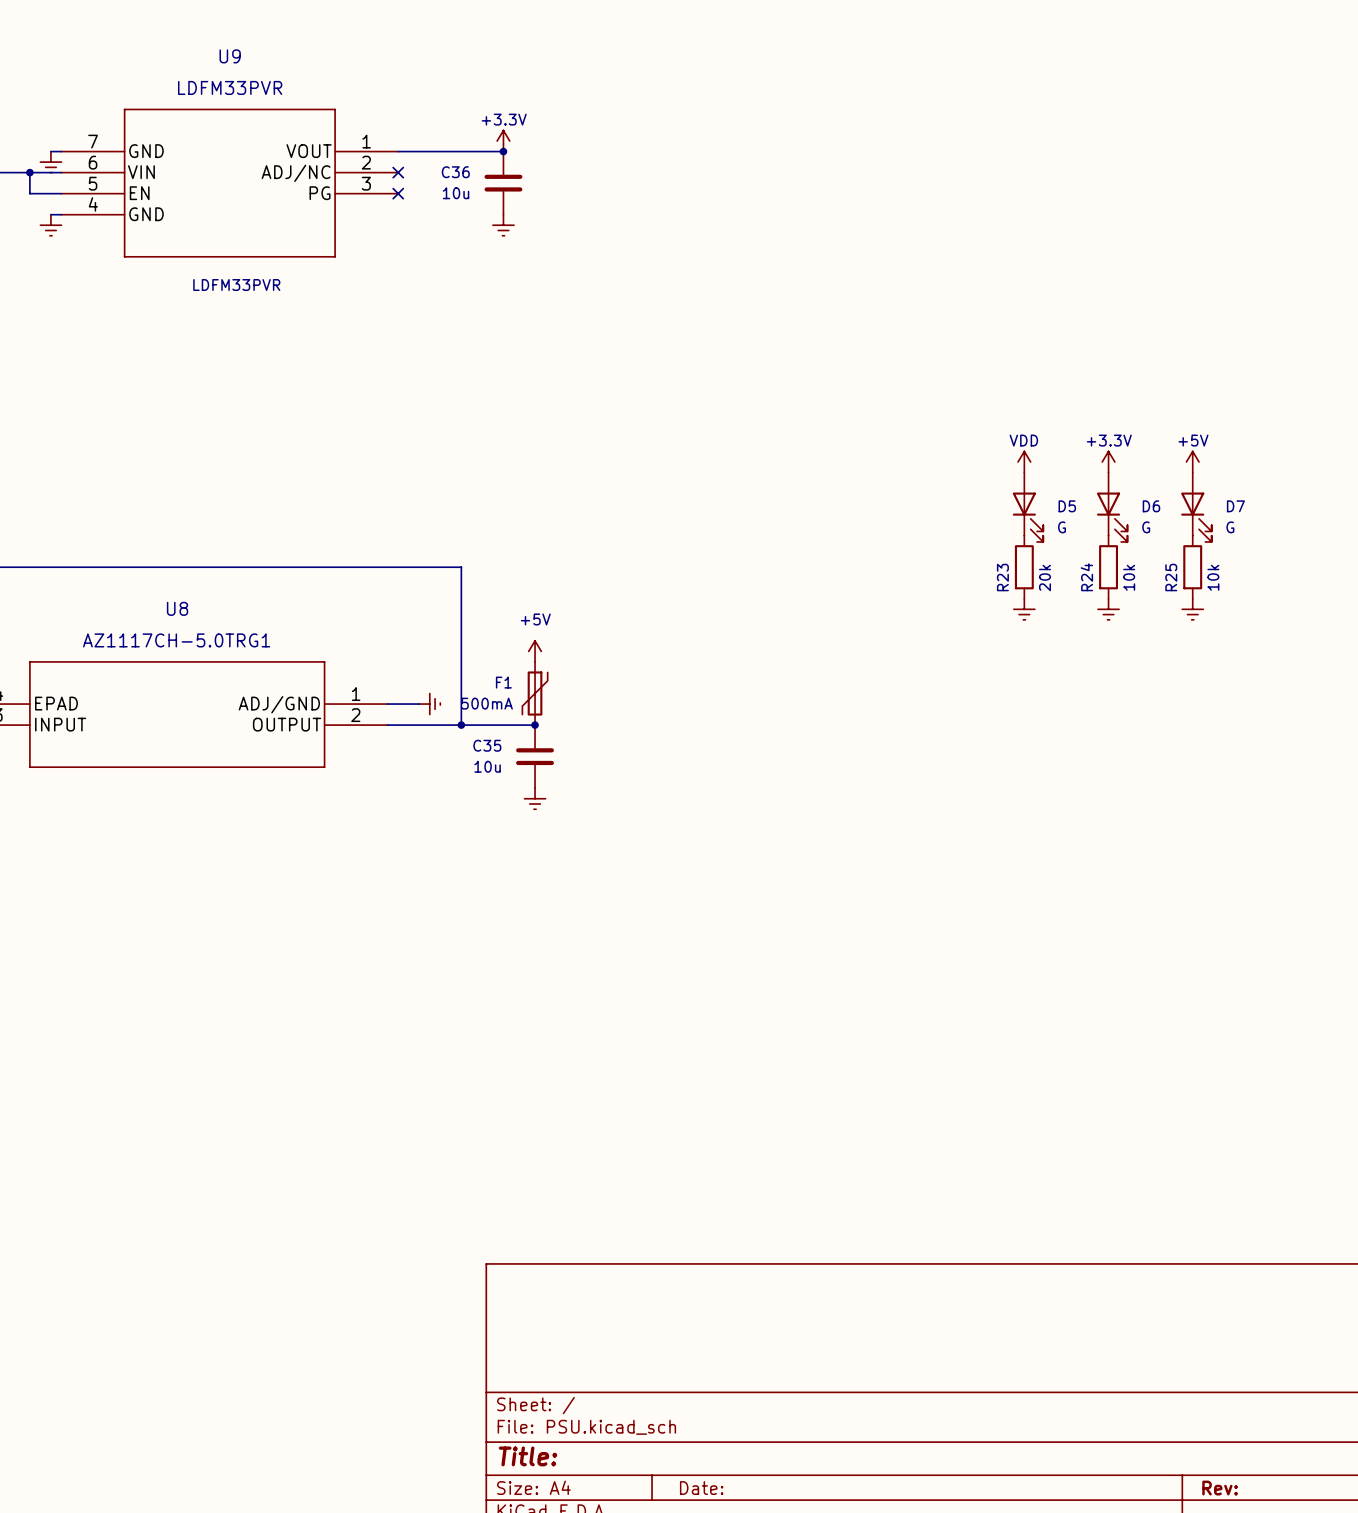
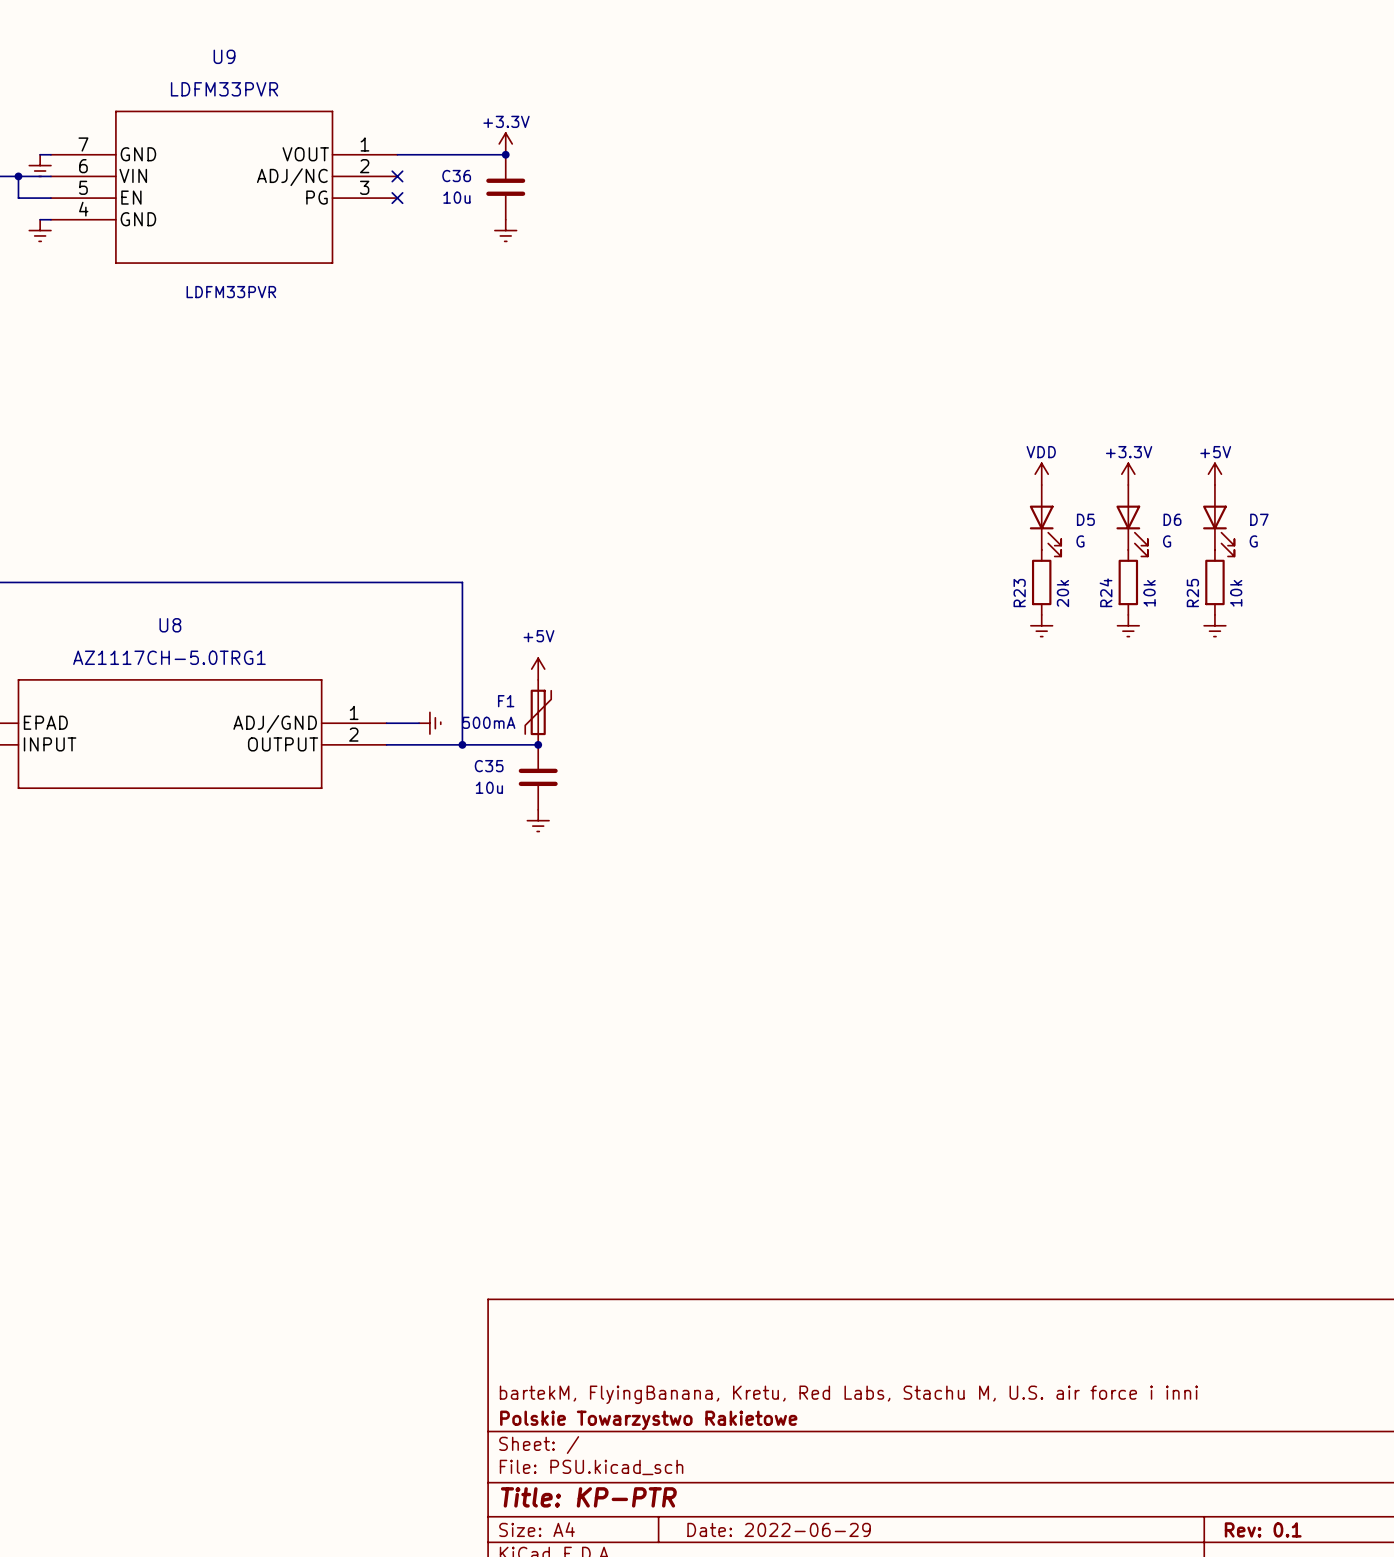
title block: none -> bartekM, FlyingBanana, Kretu, Red Labs, Stachu M, U.S. air force i inni (848, 1394)
title block: none -> Polskie Towarzystwo Rakietowe (648, 1420)
title block: Title: (527, 1456) -> Title: KP-PTR (588, 1497)
title block: Date: (701, 1488) -> Date: 2022-06-29 (779, 1529)
title block: Rev: (1220, 1488) -> Rev: 0.1 (1263, 1529)

